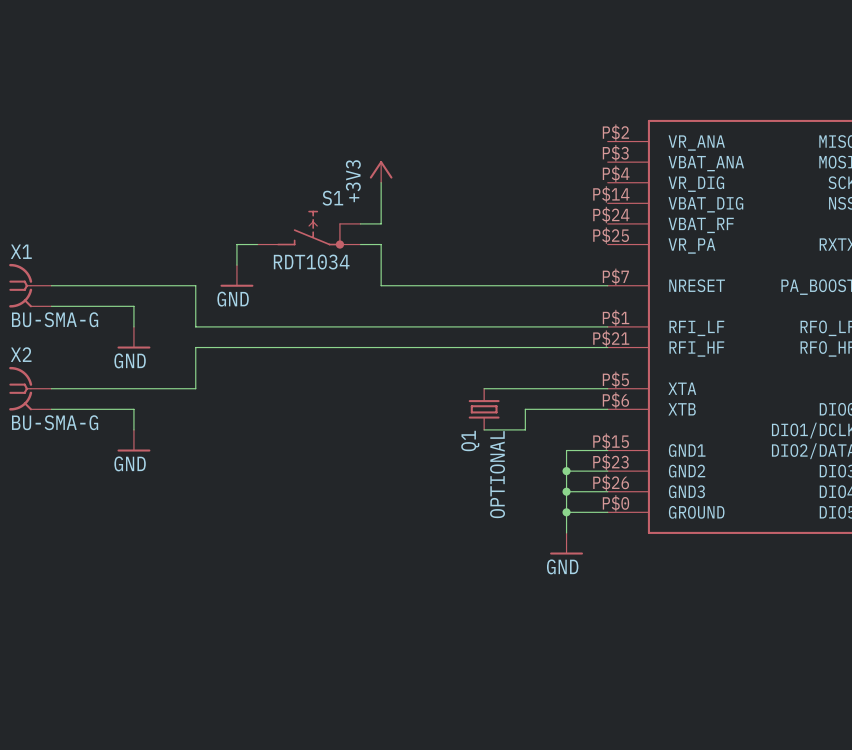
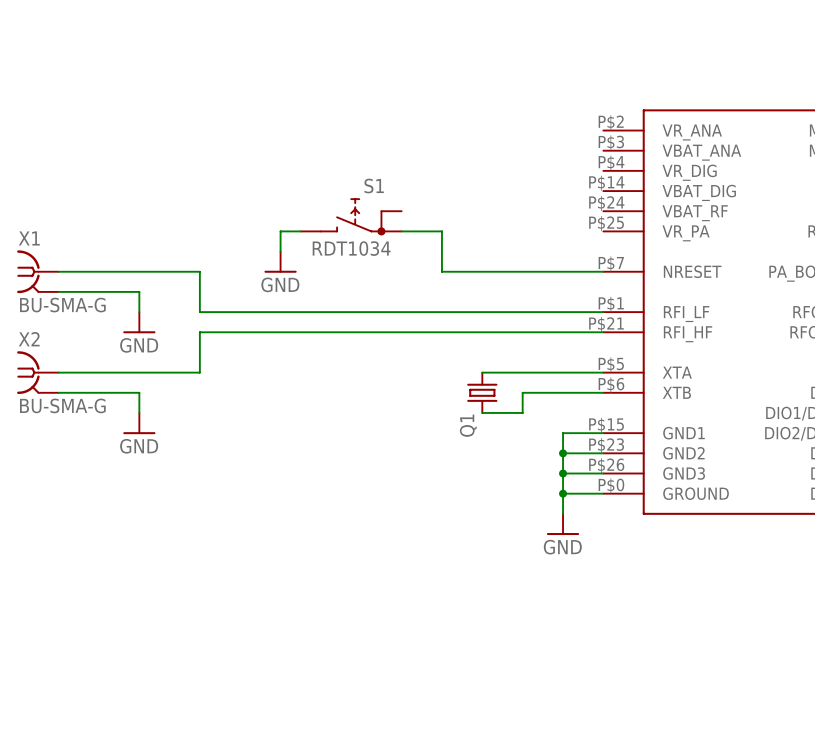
power symbol: +3V3 (381, 171) -> none
wire: (381, 182) (381, 223) (360, 223) -> none
S1 position: (309, 229) -> (351, 216)
wire: (257, 244) (236, 244) (236, 265) -> (300, 231) (280, 231) (280, 251)
wire: (360, 244) (381, 244) (381, 285) (442, 285) -> (401, 231) (441, 231) (441, 271)
power symbol position: GND (236, 275) -> GND (280, 262)
Q1 value: OPTIONAL (497, 474) -> none

